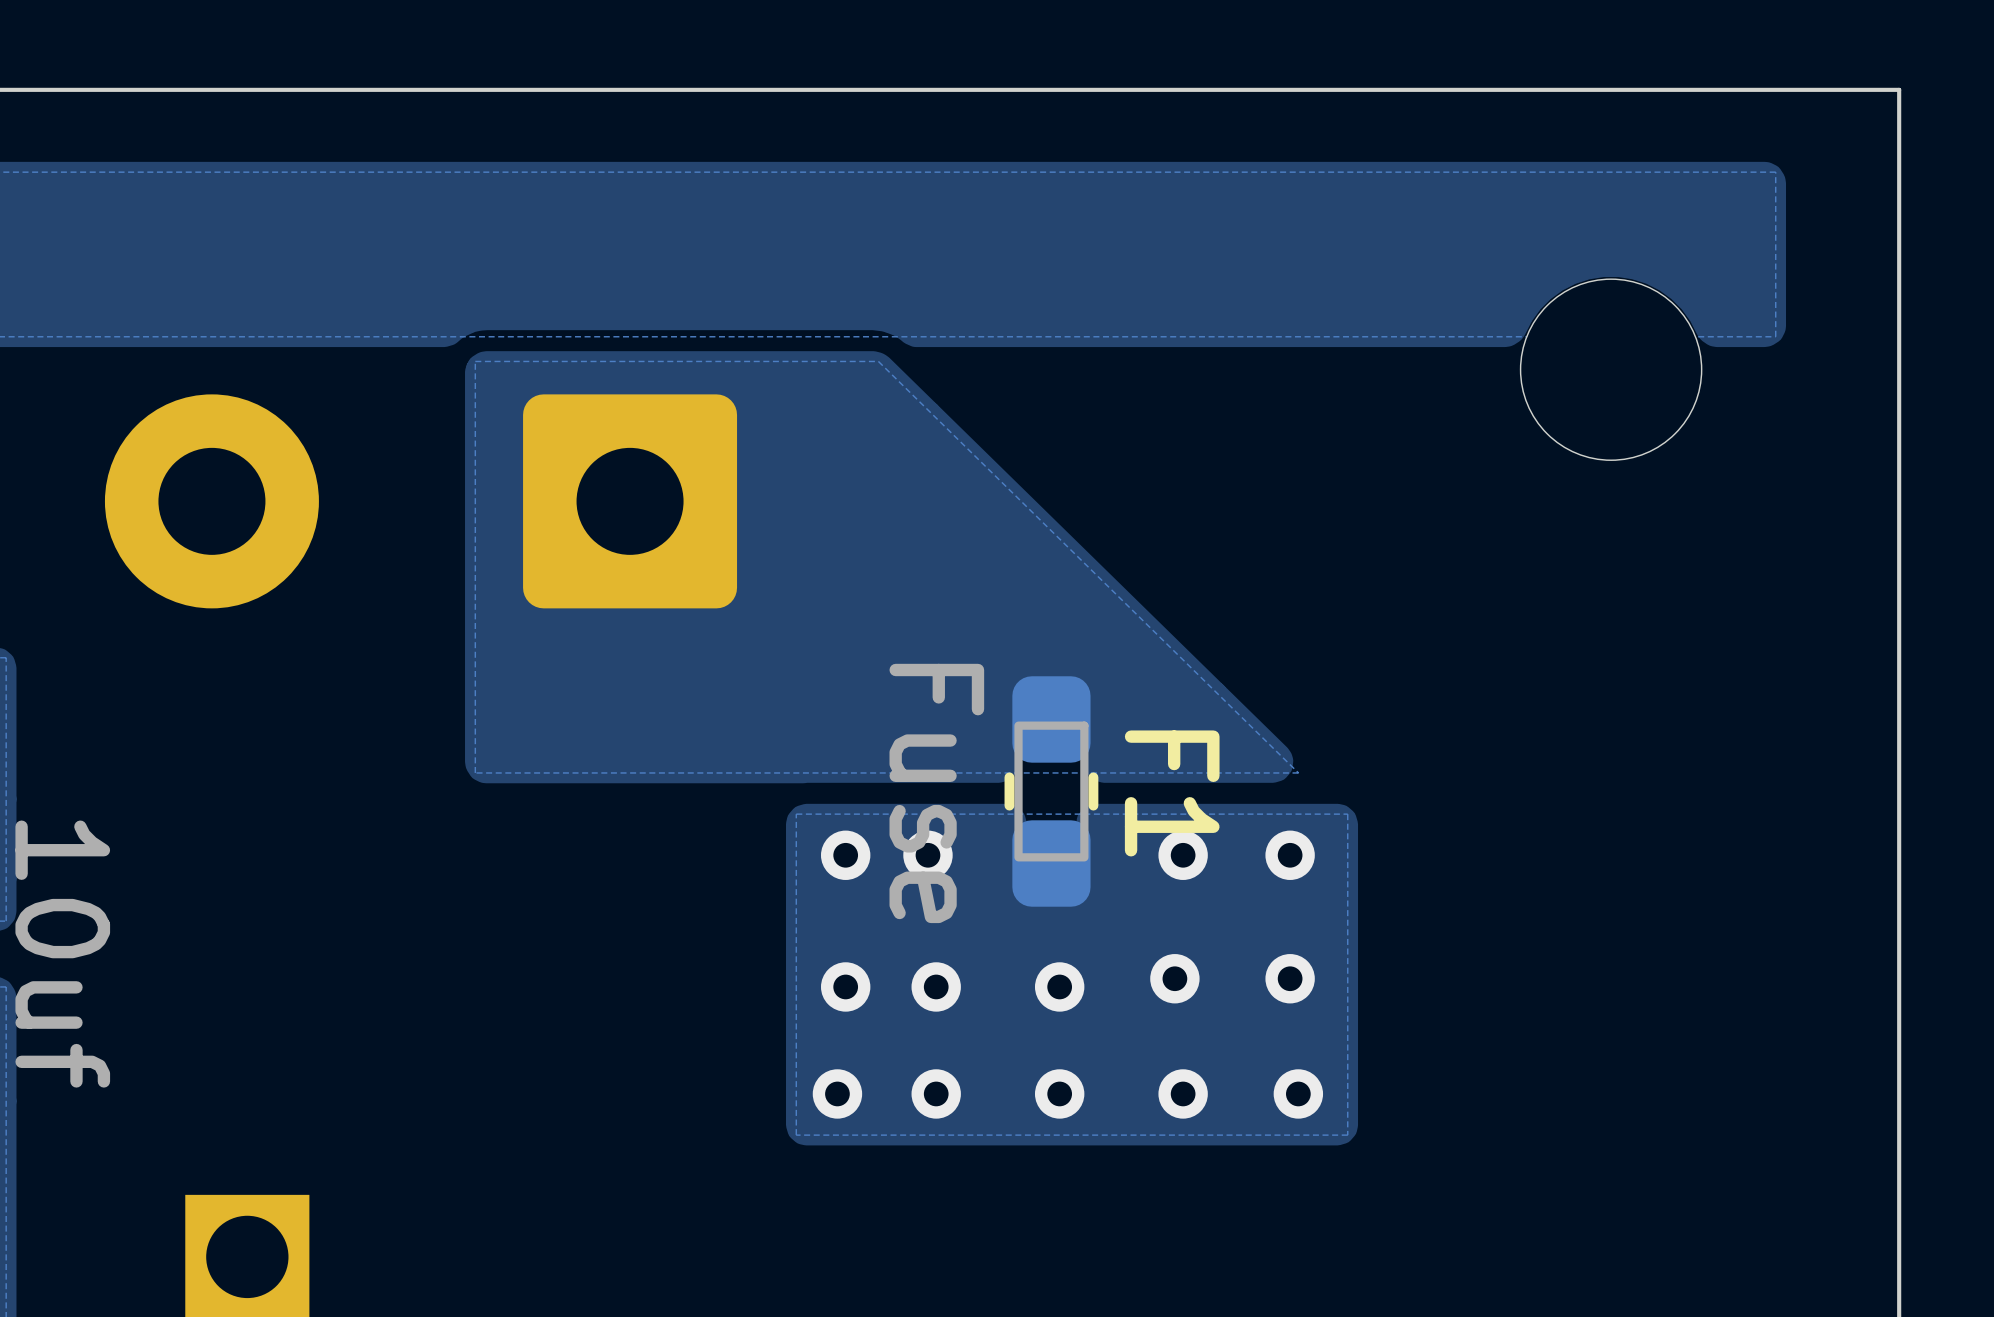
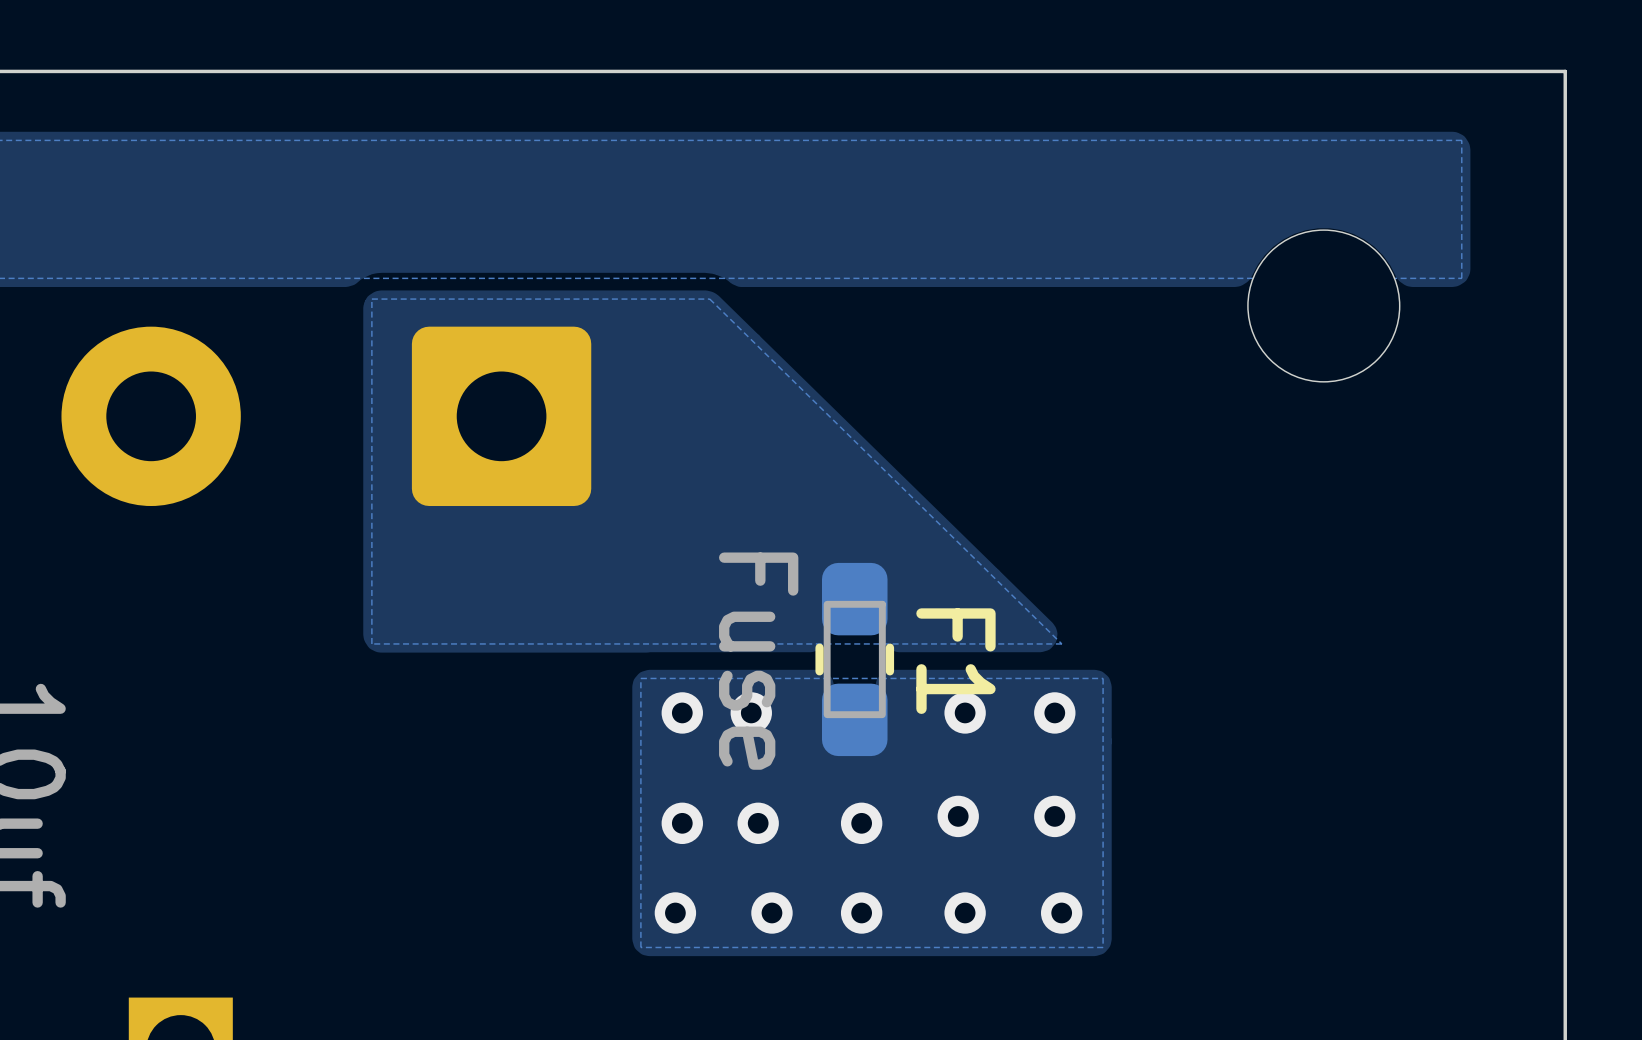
via position: (936, 1093) -> (771, 912)

